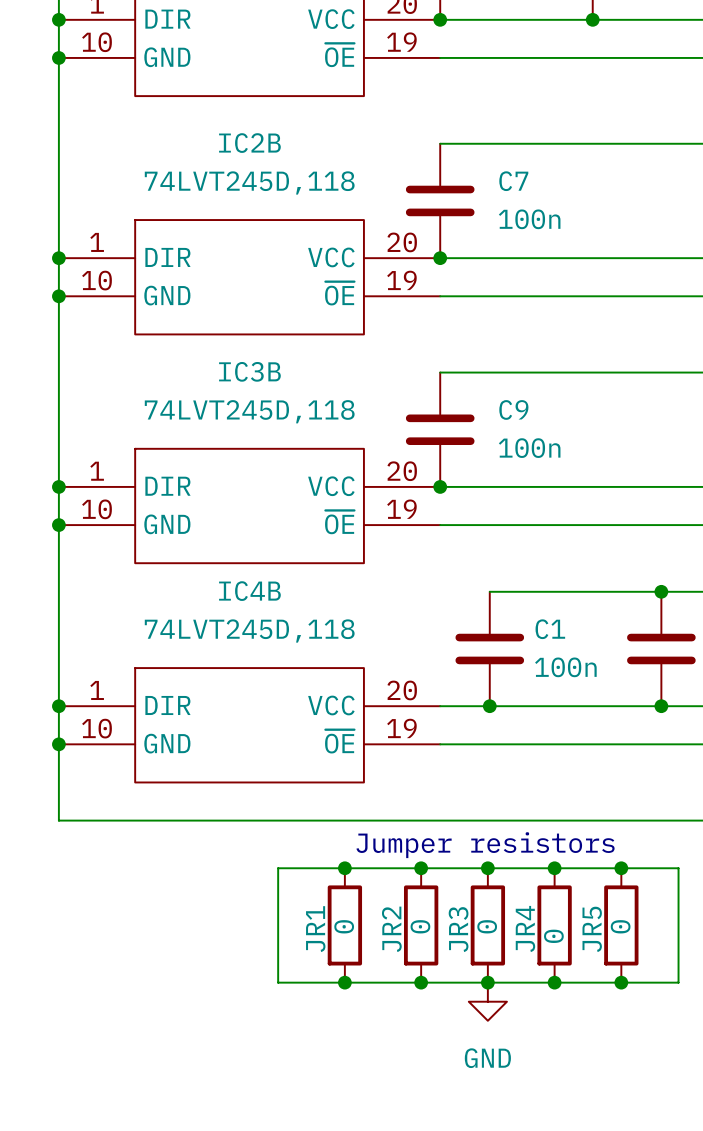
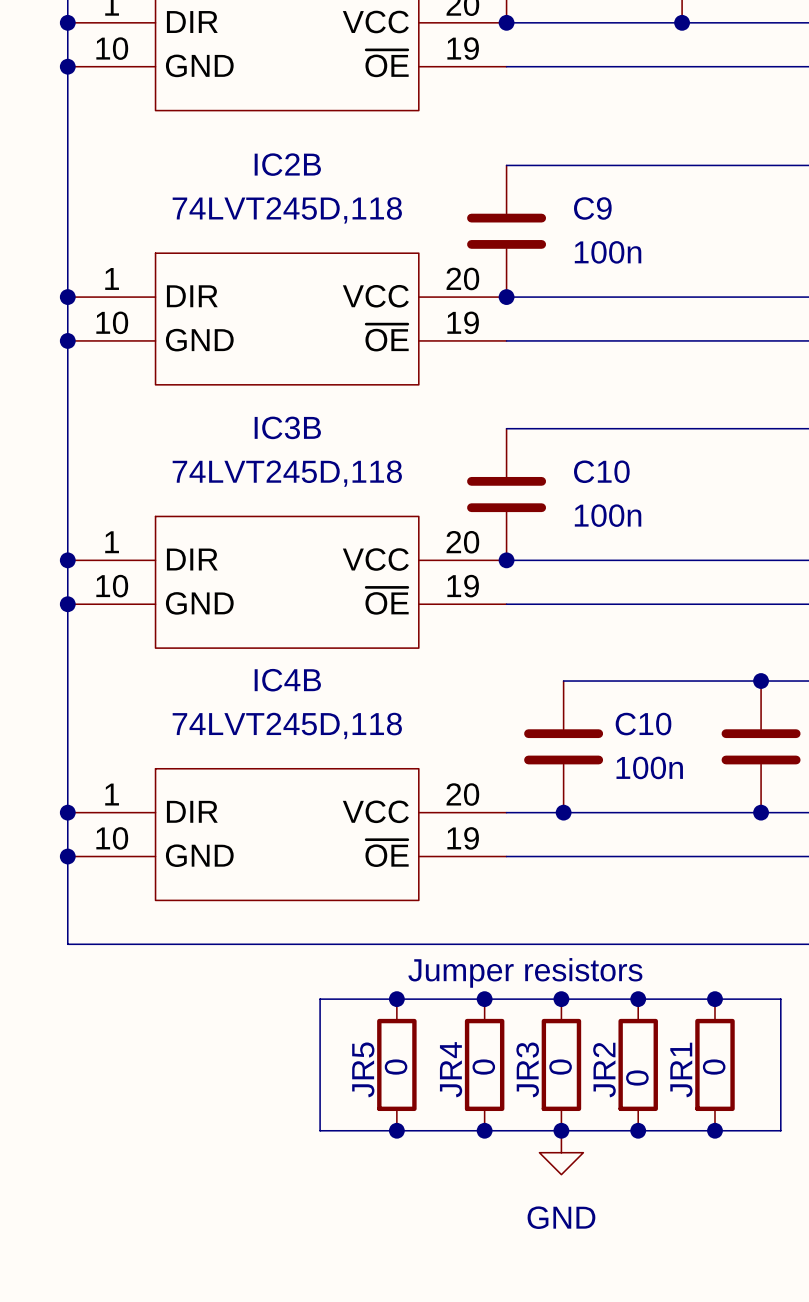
C7 name: C7 (513, 181) -> C9 (592, 208)
C9 name: C9 (513, 409) -> C10 (601, 471)
C1 name: C1 (550, 629) -> C10 (643, 724)
JR4 name: JR4 (525, 928) -> JR2 (604, 1070)
JR1 name: JR1 (315, 929) -> JR5 (363, 1069)
JR2 name: JR2 (391, 929) -> JR4 (451, 1069)
JR5 name: JR5 (592, 929) -> JR1 (681, 1070)

